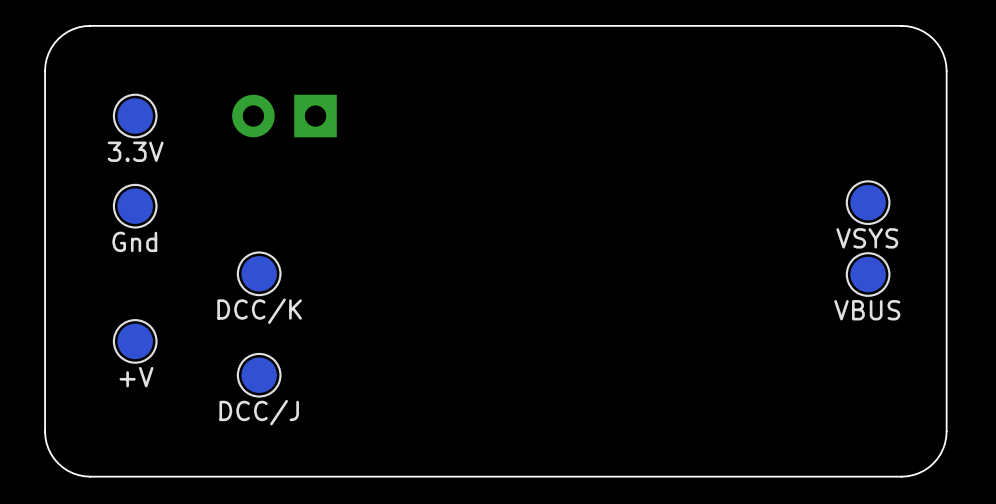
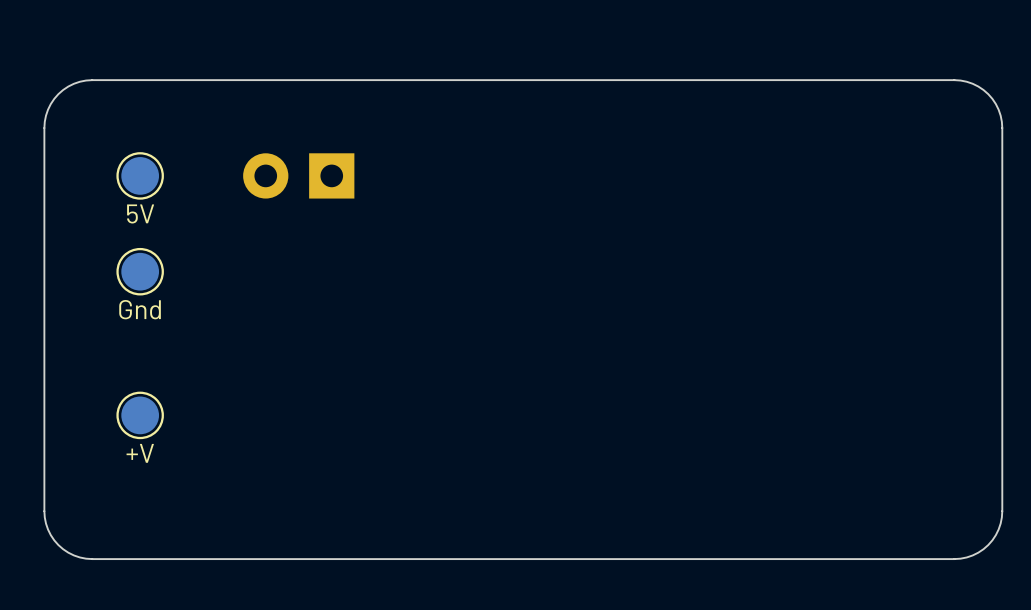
part value: 3.3V (135, 151) -> 5V (140, 213)
part: VSYS (868, 202) -> none
part: DCC/K (259, 273) -> none
part: VBUS (868, 274) -> none
part: DCC/J (259, 375) -> none

